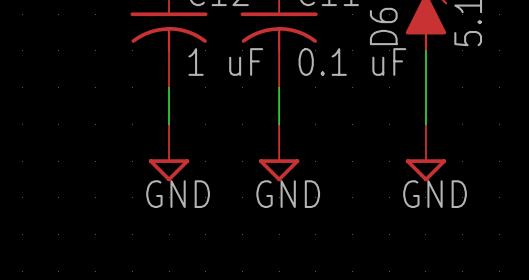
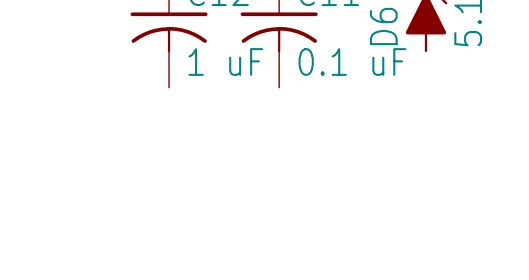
wire: (425, 50) (425, 124) -> none
wire: (169, 87) (169, 124) -> none
wire: (279, 87) (279, 124) -> none
power symbol: GND (169, 152) -> none
power symbol: GND (279, 152) -> none
power symbol: GND (425, 152) -> none

